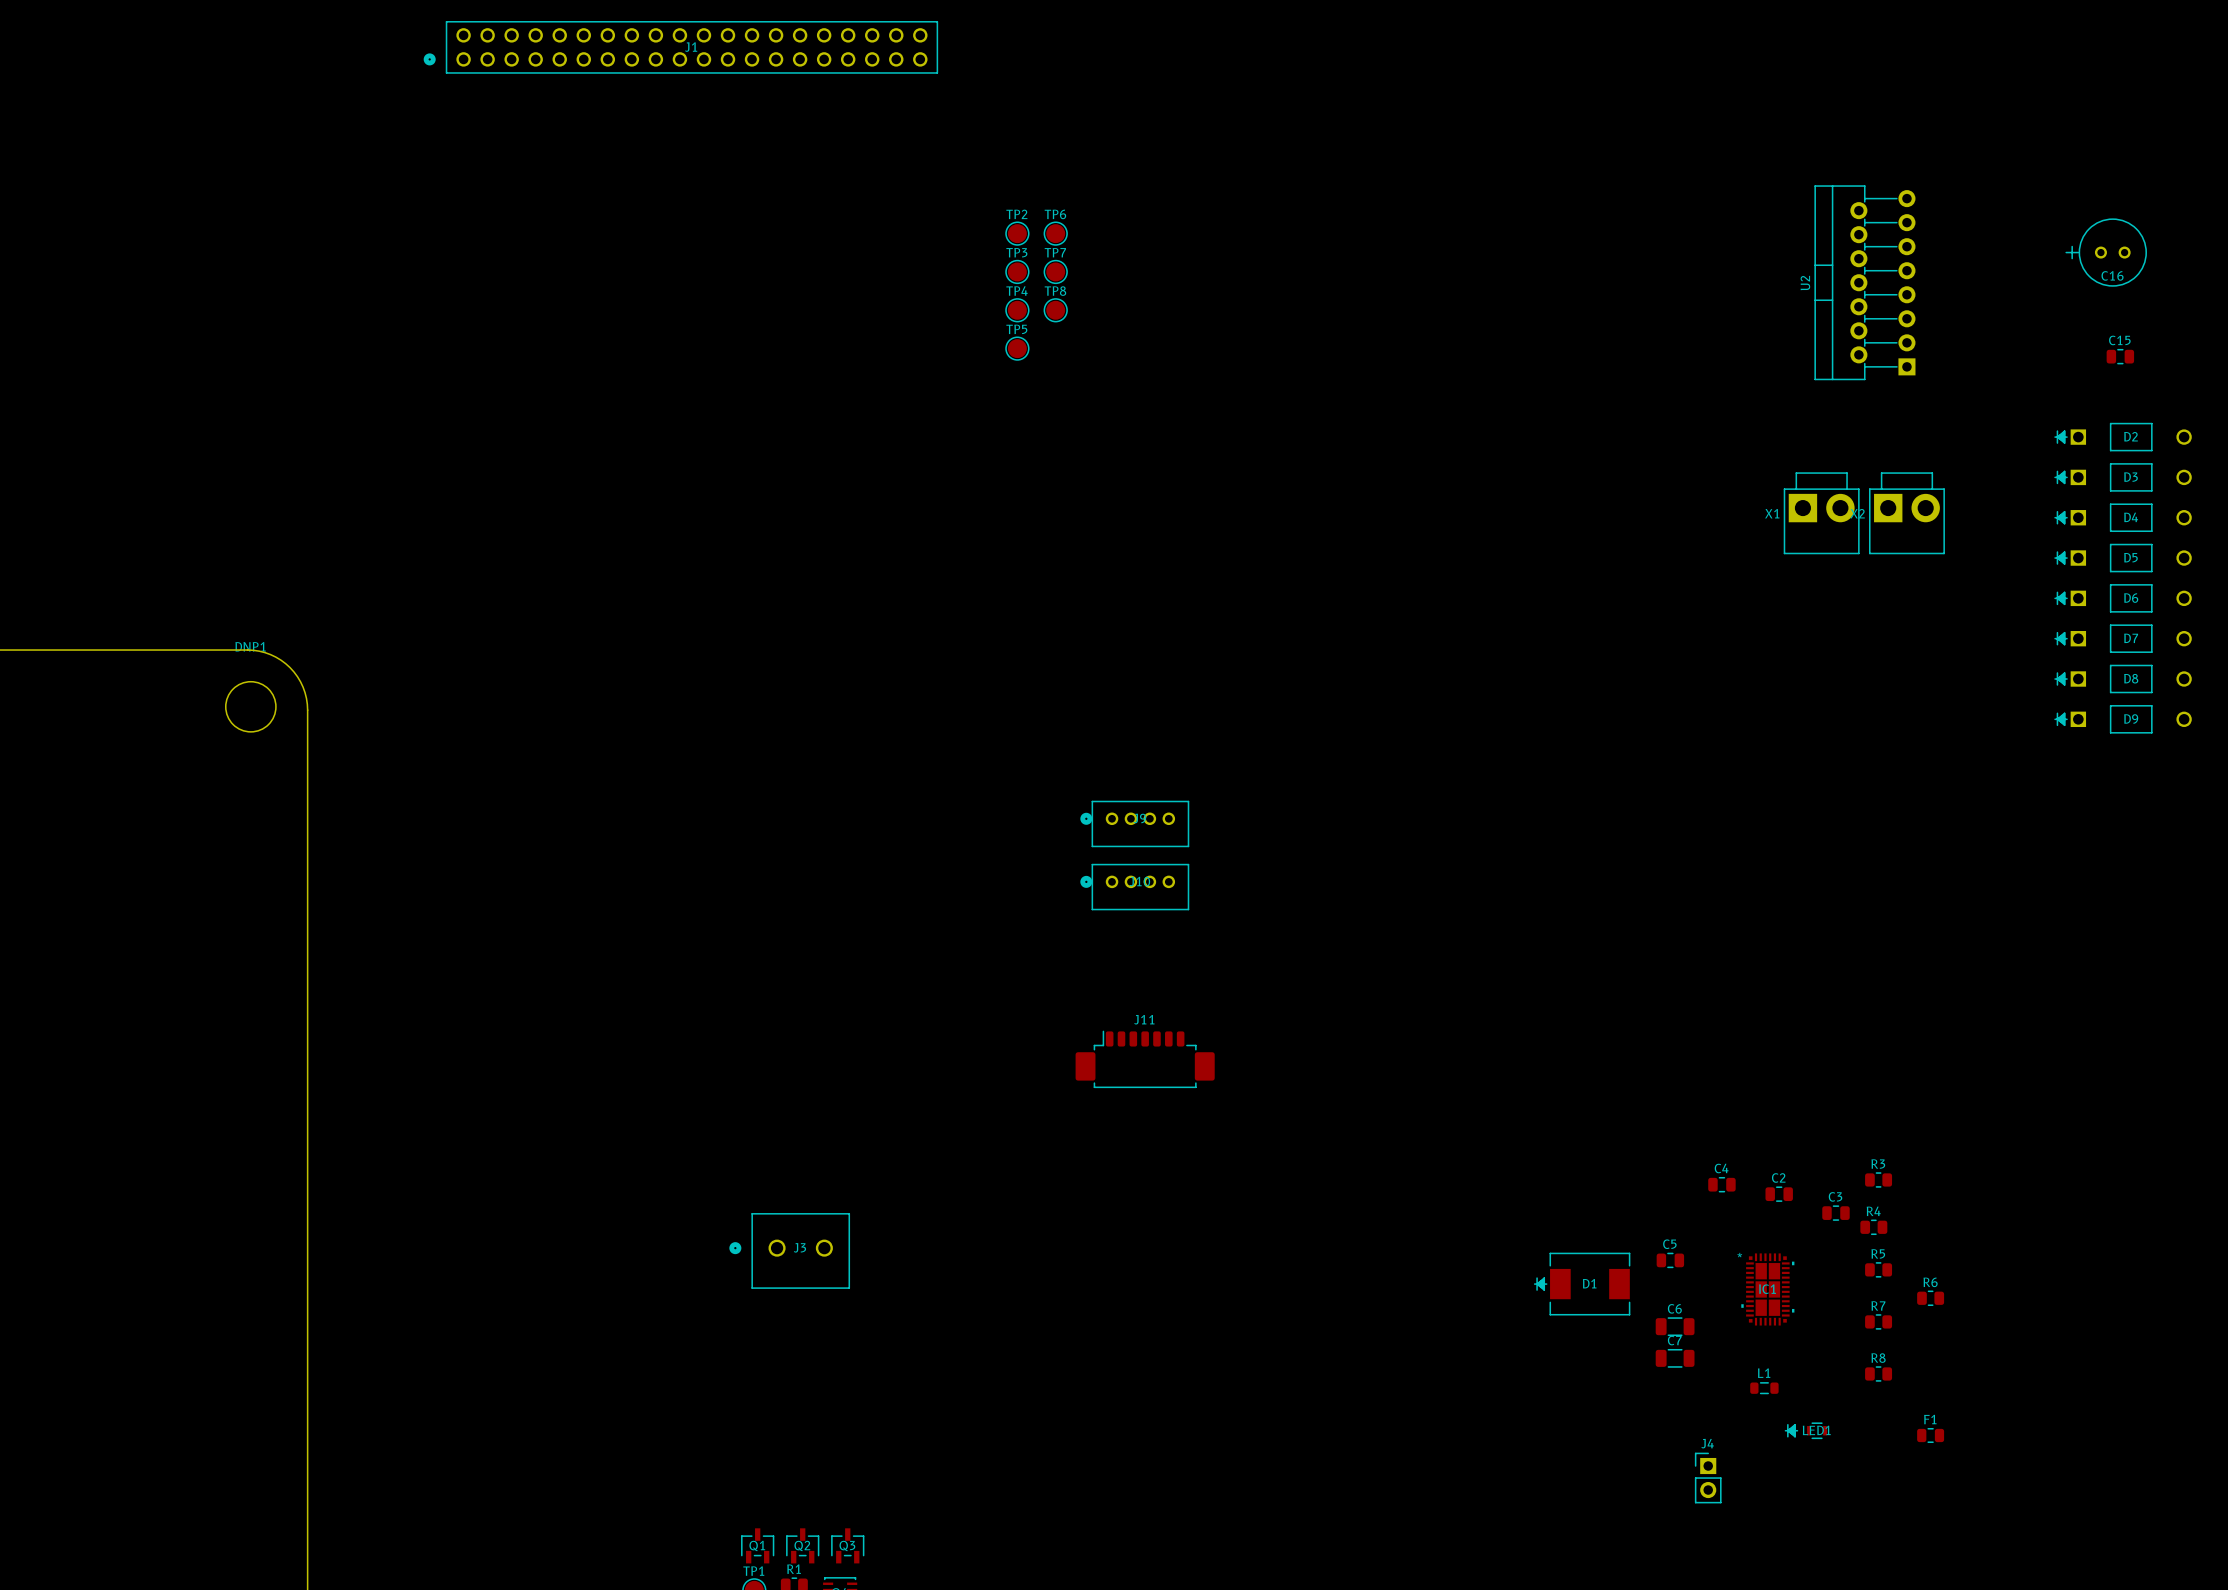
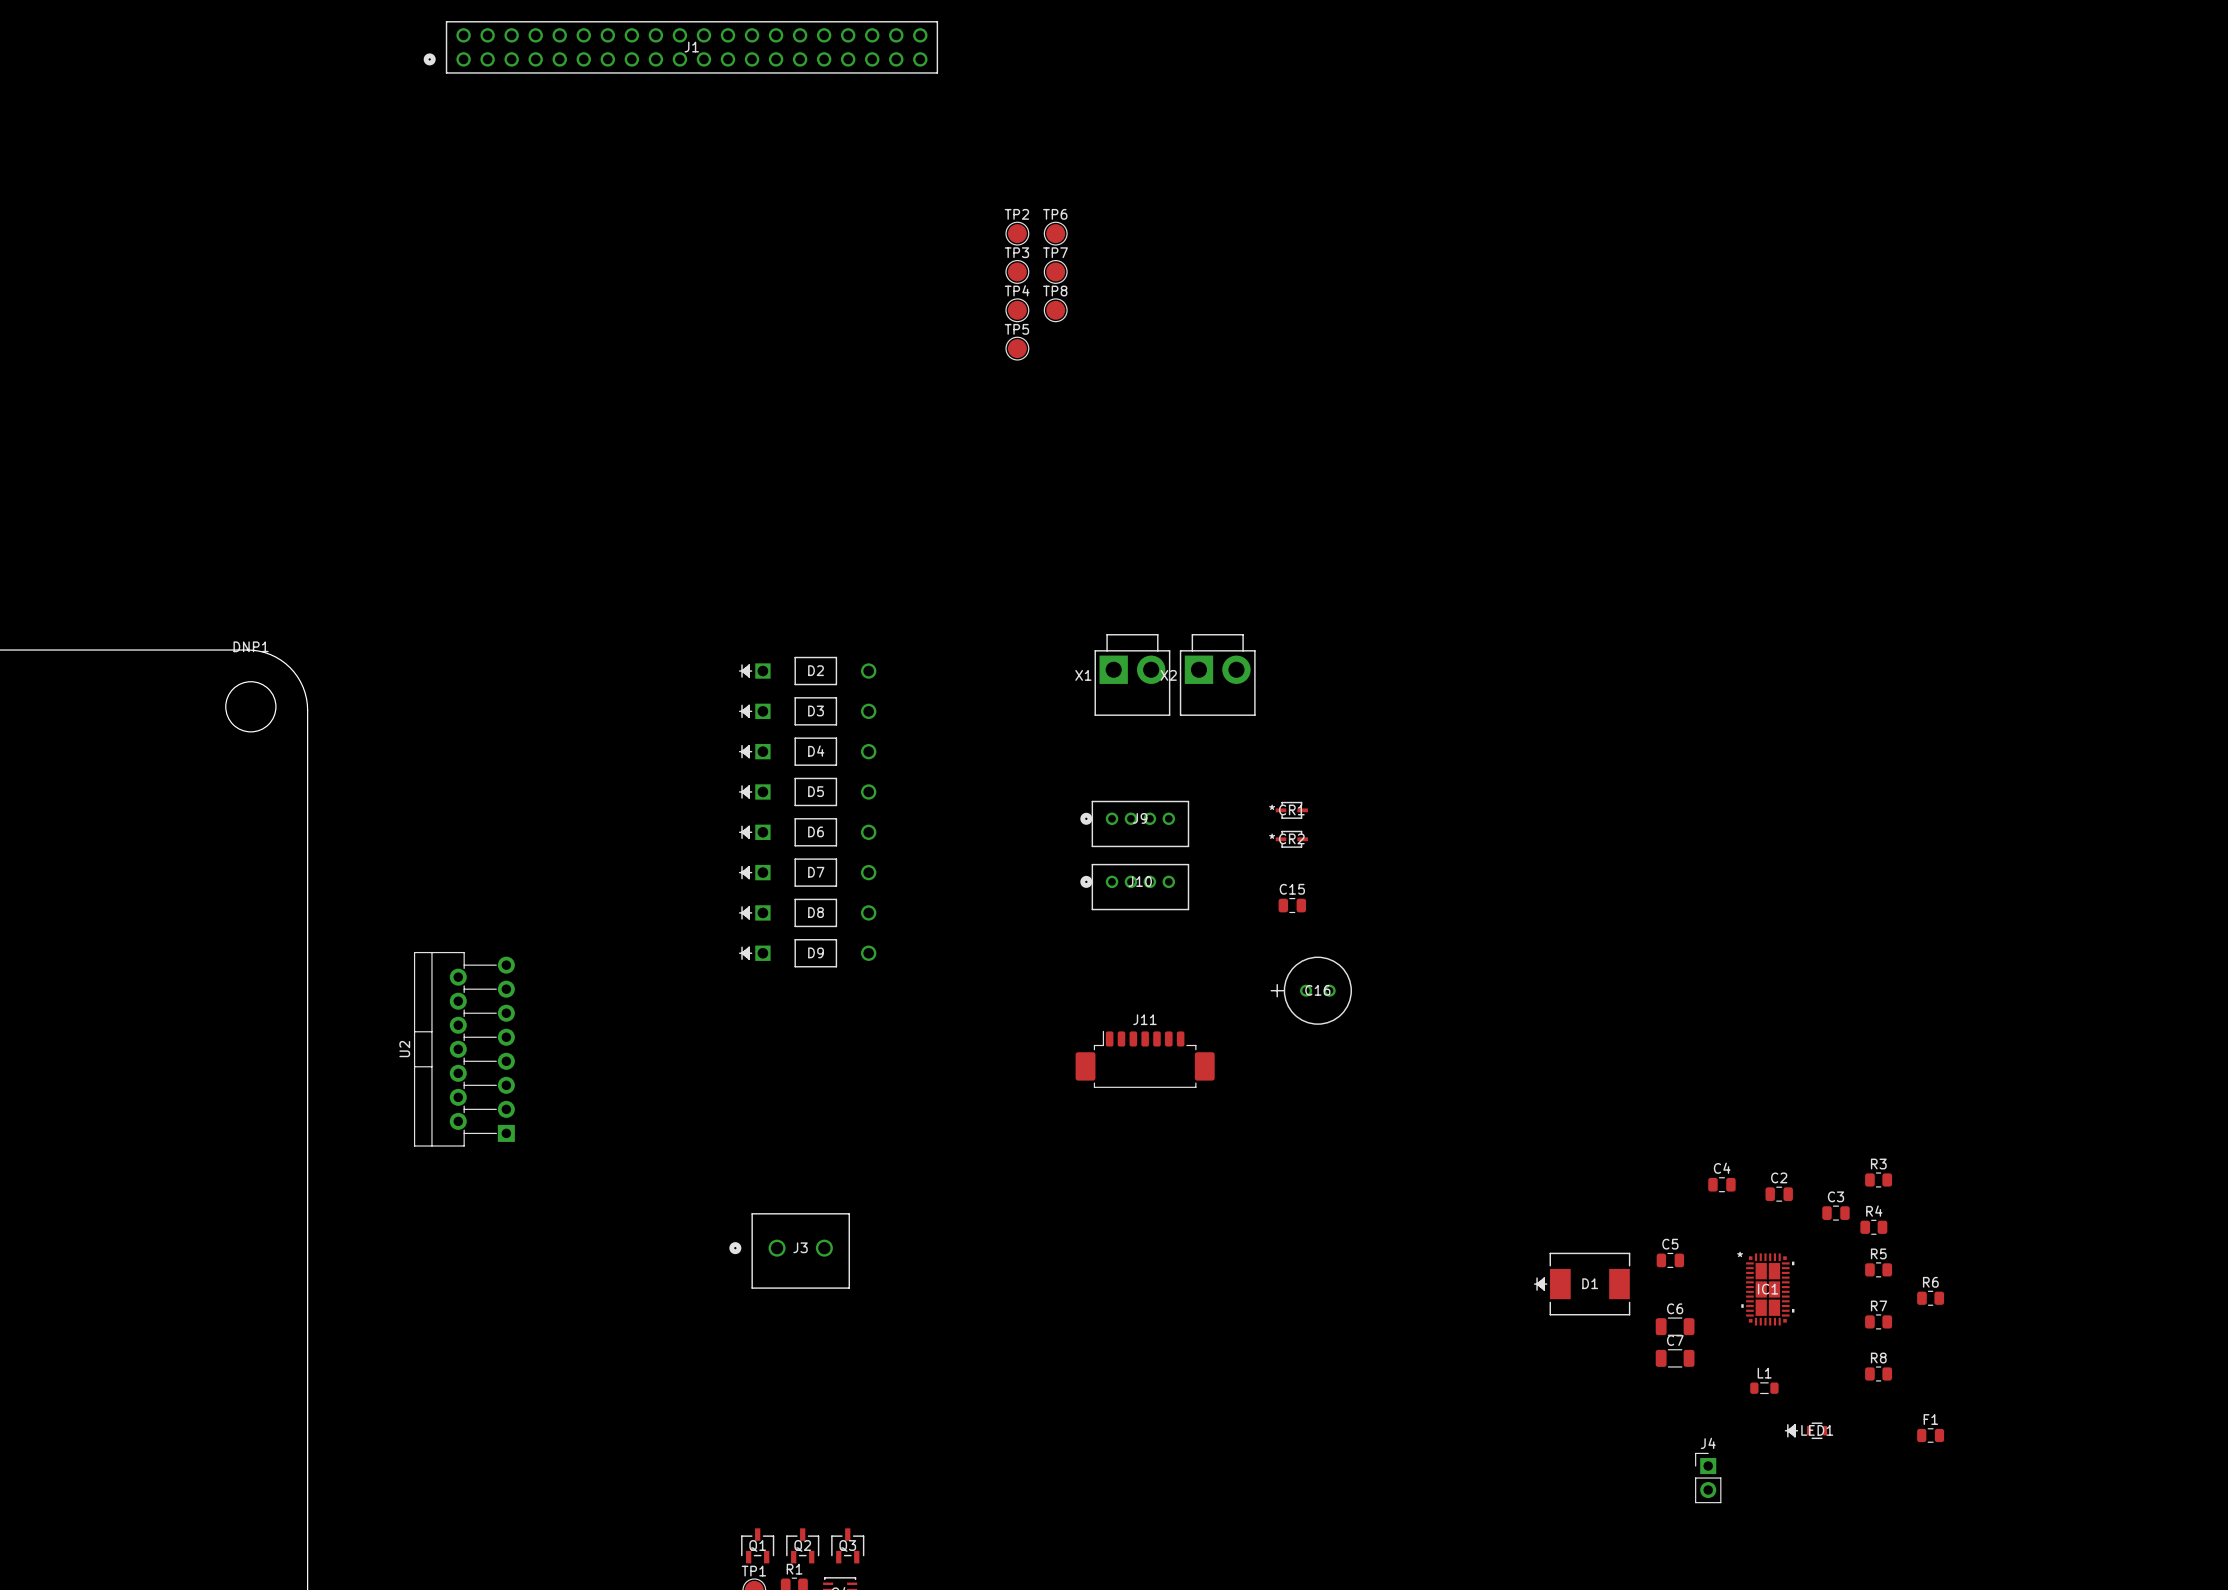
C16 position: (2106, 252) -> (1311, 990)
C16 name position: C16 (2112, 275) -> C16 (1317, 990)
U2 position: (1865, 282) -> (464, 1049)
C15 position: (2120, 356) -> (1292, 905)
D2 position: (2123, 437) -> (807, 671)
D3 position: (2123, 477) -> (807, 711)
X1 position: (1821, 513) -> (1132, 674)
X2 position: (1906, 513) -> (1217, 674)
D4 position: (2123, 517) -> (807, 751)
D5 position: (2123, 558) -> (807, 791)
D6 position: (2123, 598) -> (807, 832)
D7 position: (2123, 638) -> (807, 872)
D8 position: (2123, 679) -> (807, 912)
D9 position: (2123, 719) -> (807, 953)
CR1: none -> (1291, 810)
CR2: none -> (1291, 839)

